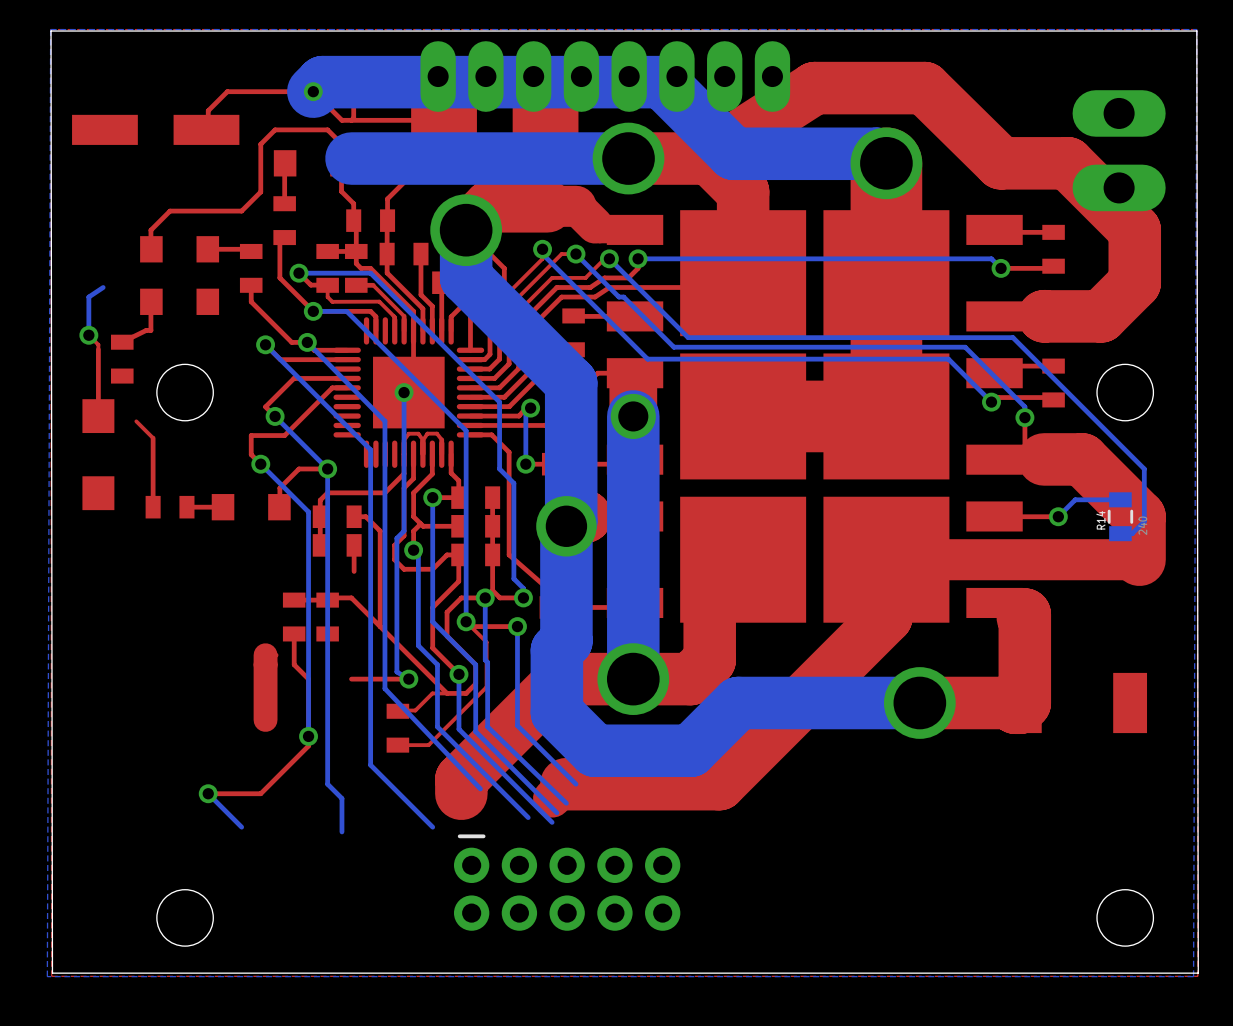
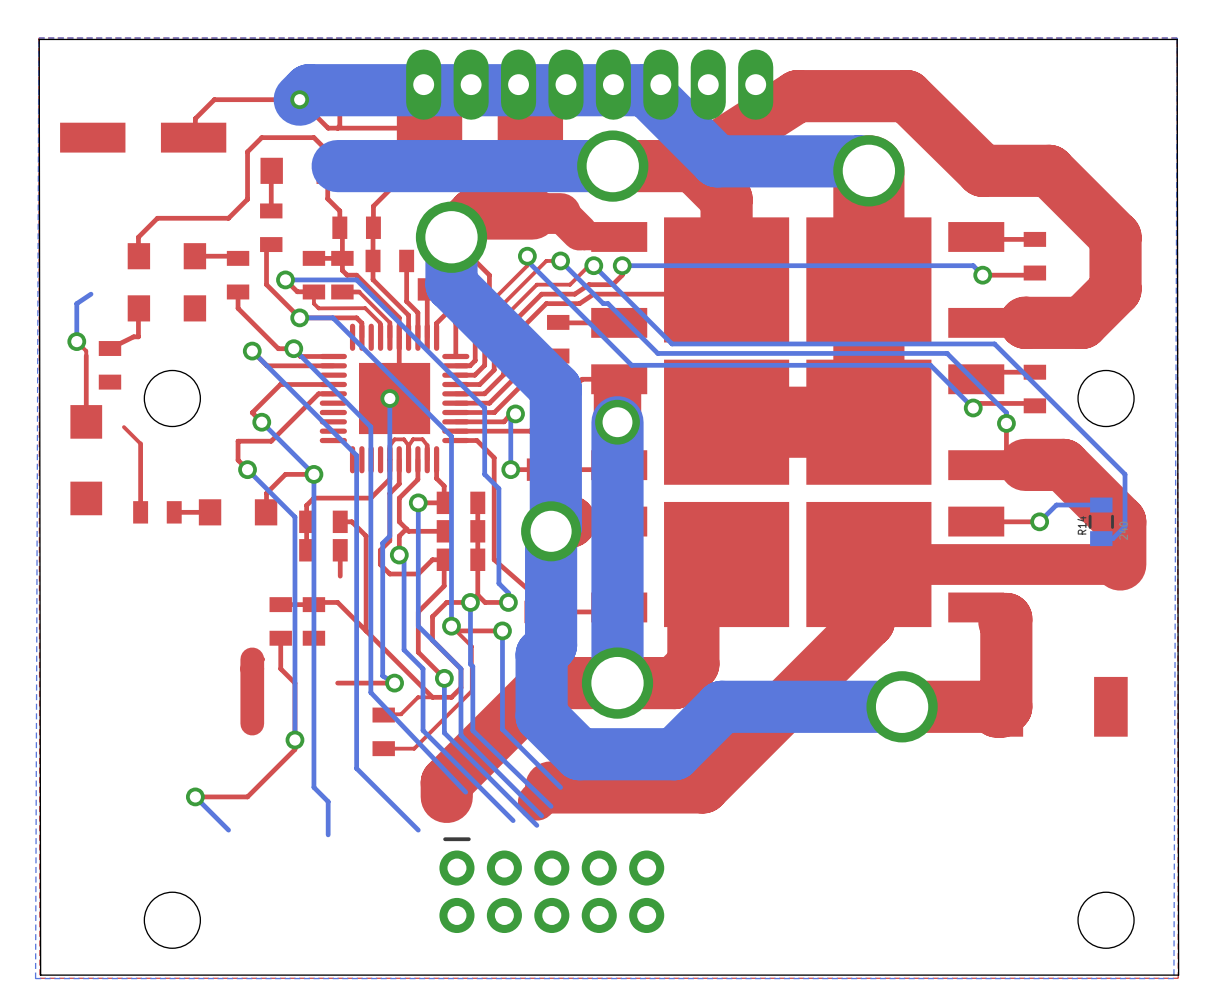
part: (1119, 150) -> none

